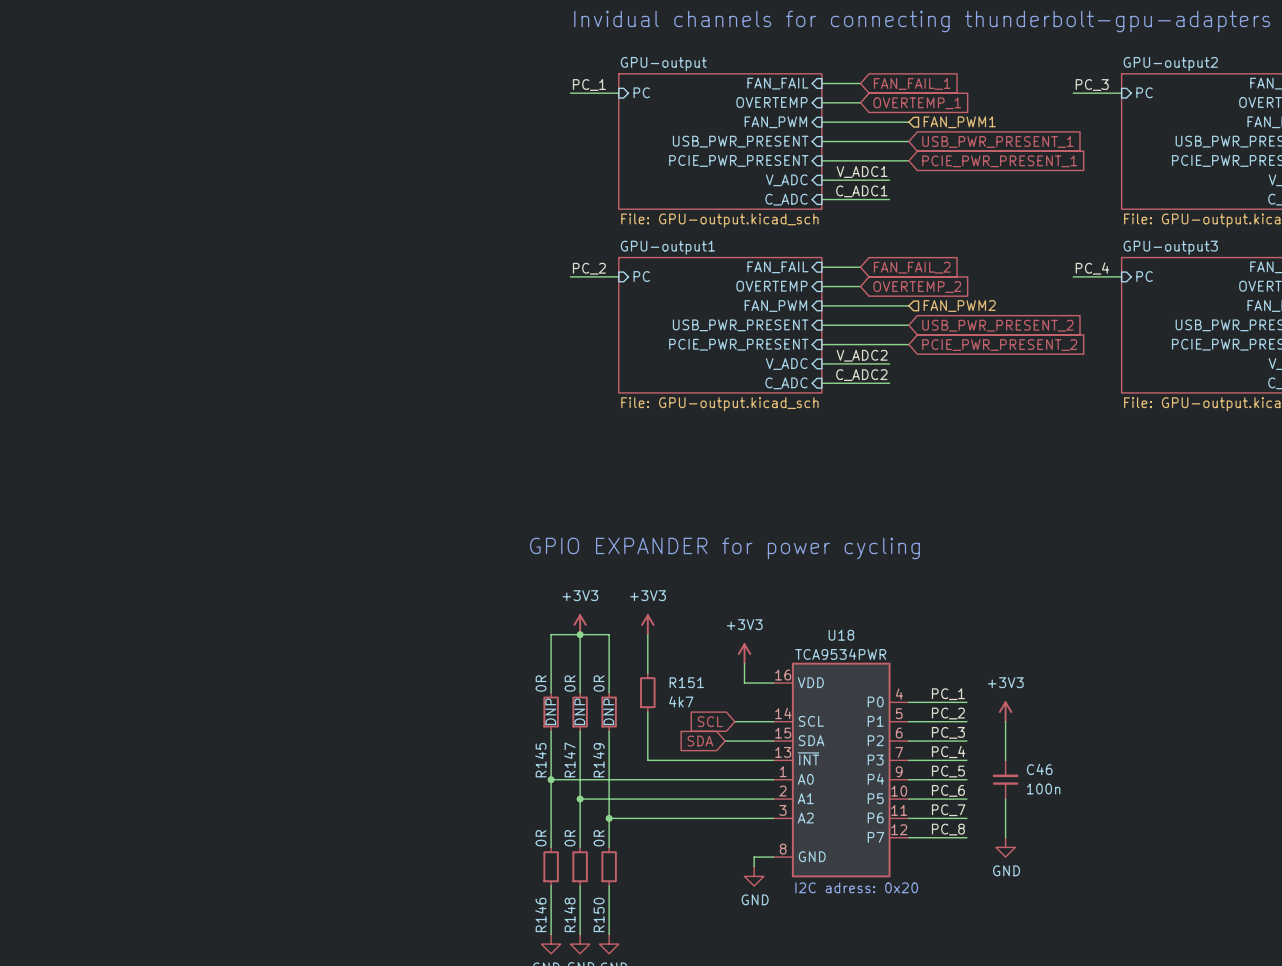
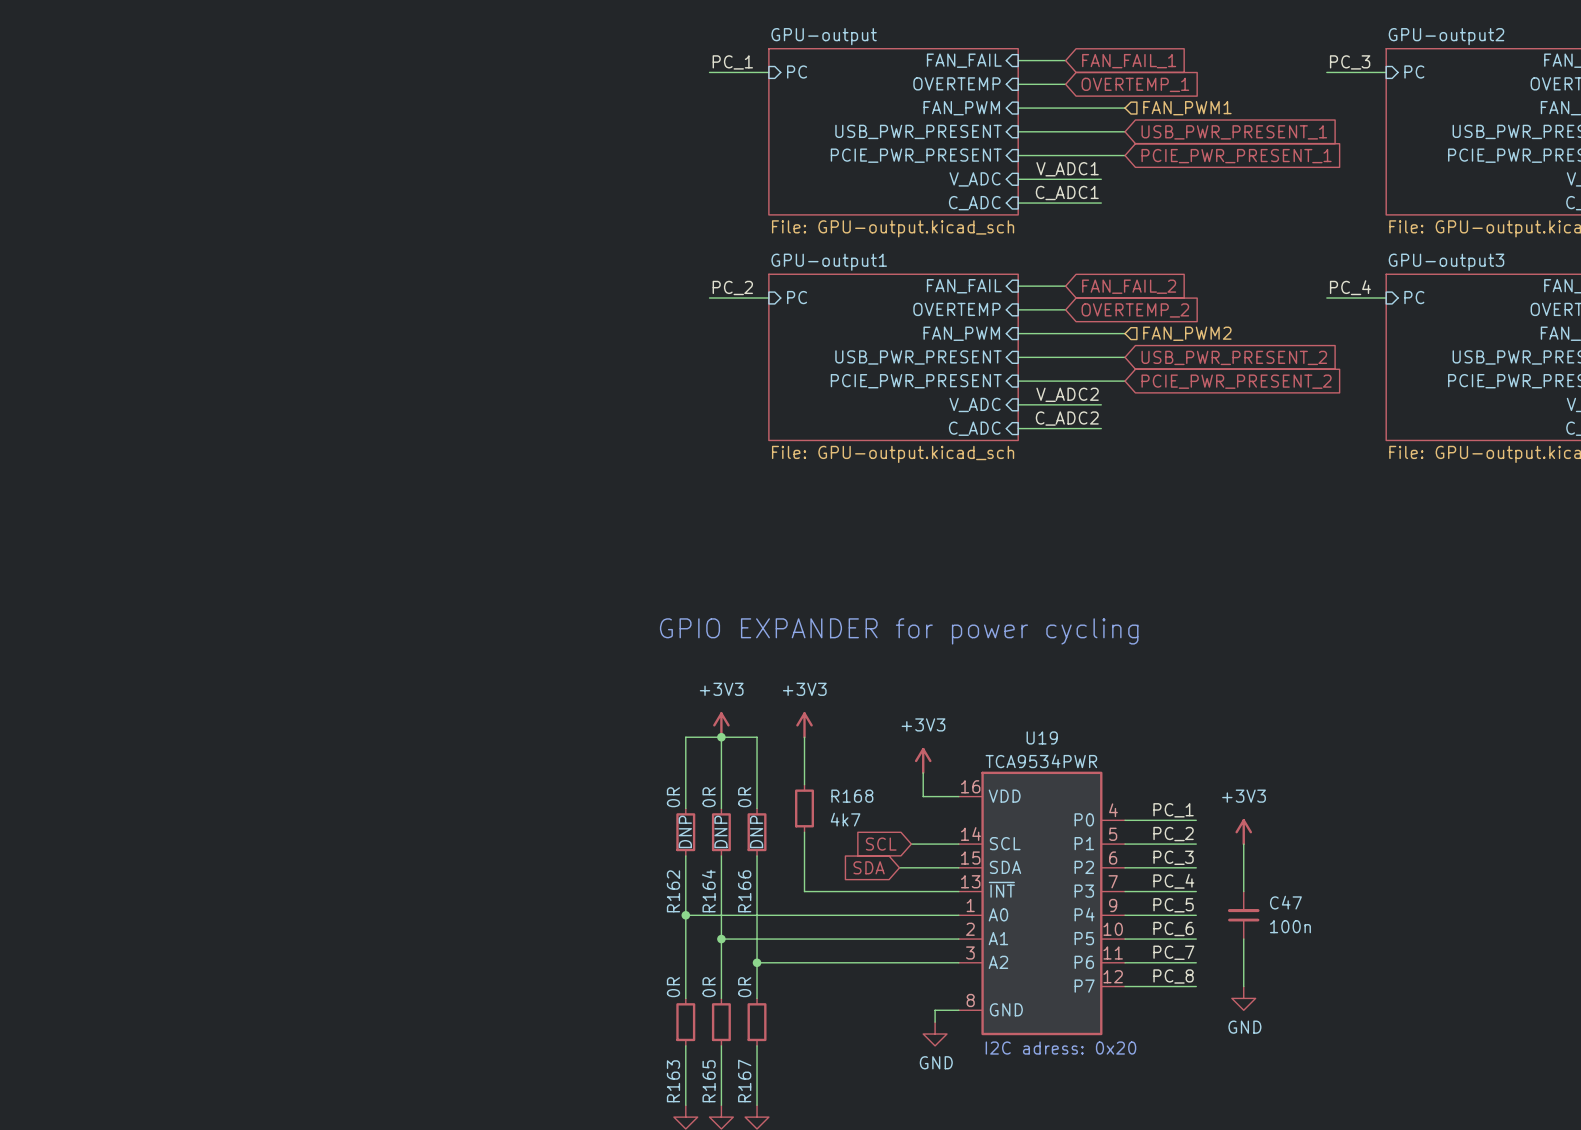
U18 name: U18 (841, 635) -> U19 (1042, 737)
R151 name: R151 (686, 682) -> R168 (852, 796)
R147 name: R147 (569, 759) -> R164 (708, 891)
R145 name: R145 (540, 760) -> R162 (673, 891)
R149 name: R149 (598, 760) -> R166 (744, 891)
C46 name: C46 (1039, 769) -> C47 (1285, 902)
R146 name: R146 (540, 914) -> R163 (673, 1081)
R148 name: R148 (569, 914) -> R165 (709, 1081)
R150 name: R150 (599, 914) -> R167 (744, 1081)

